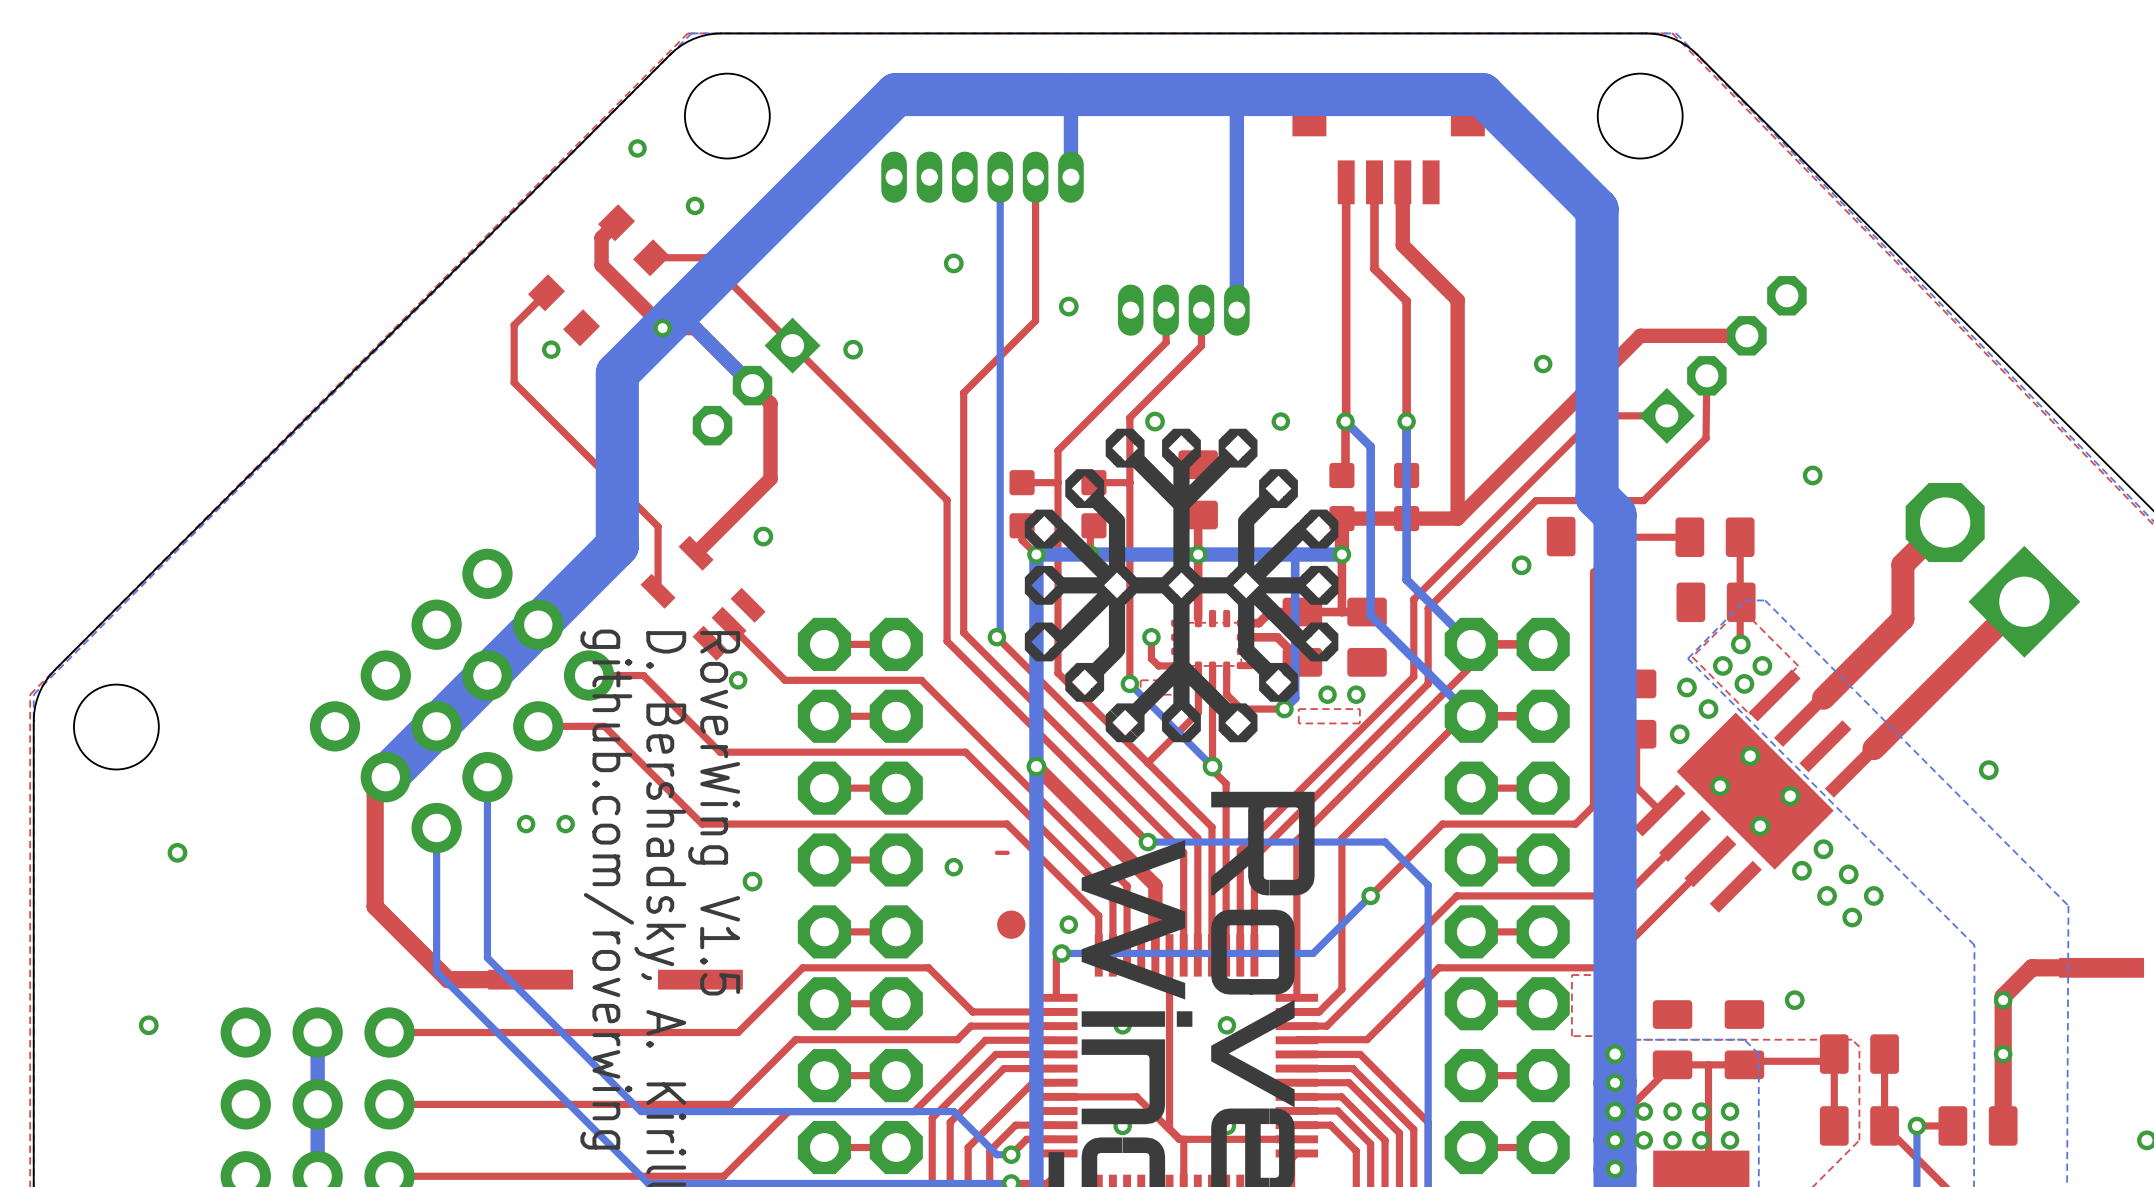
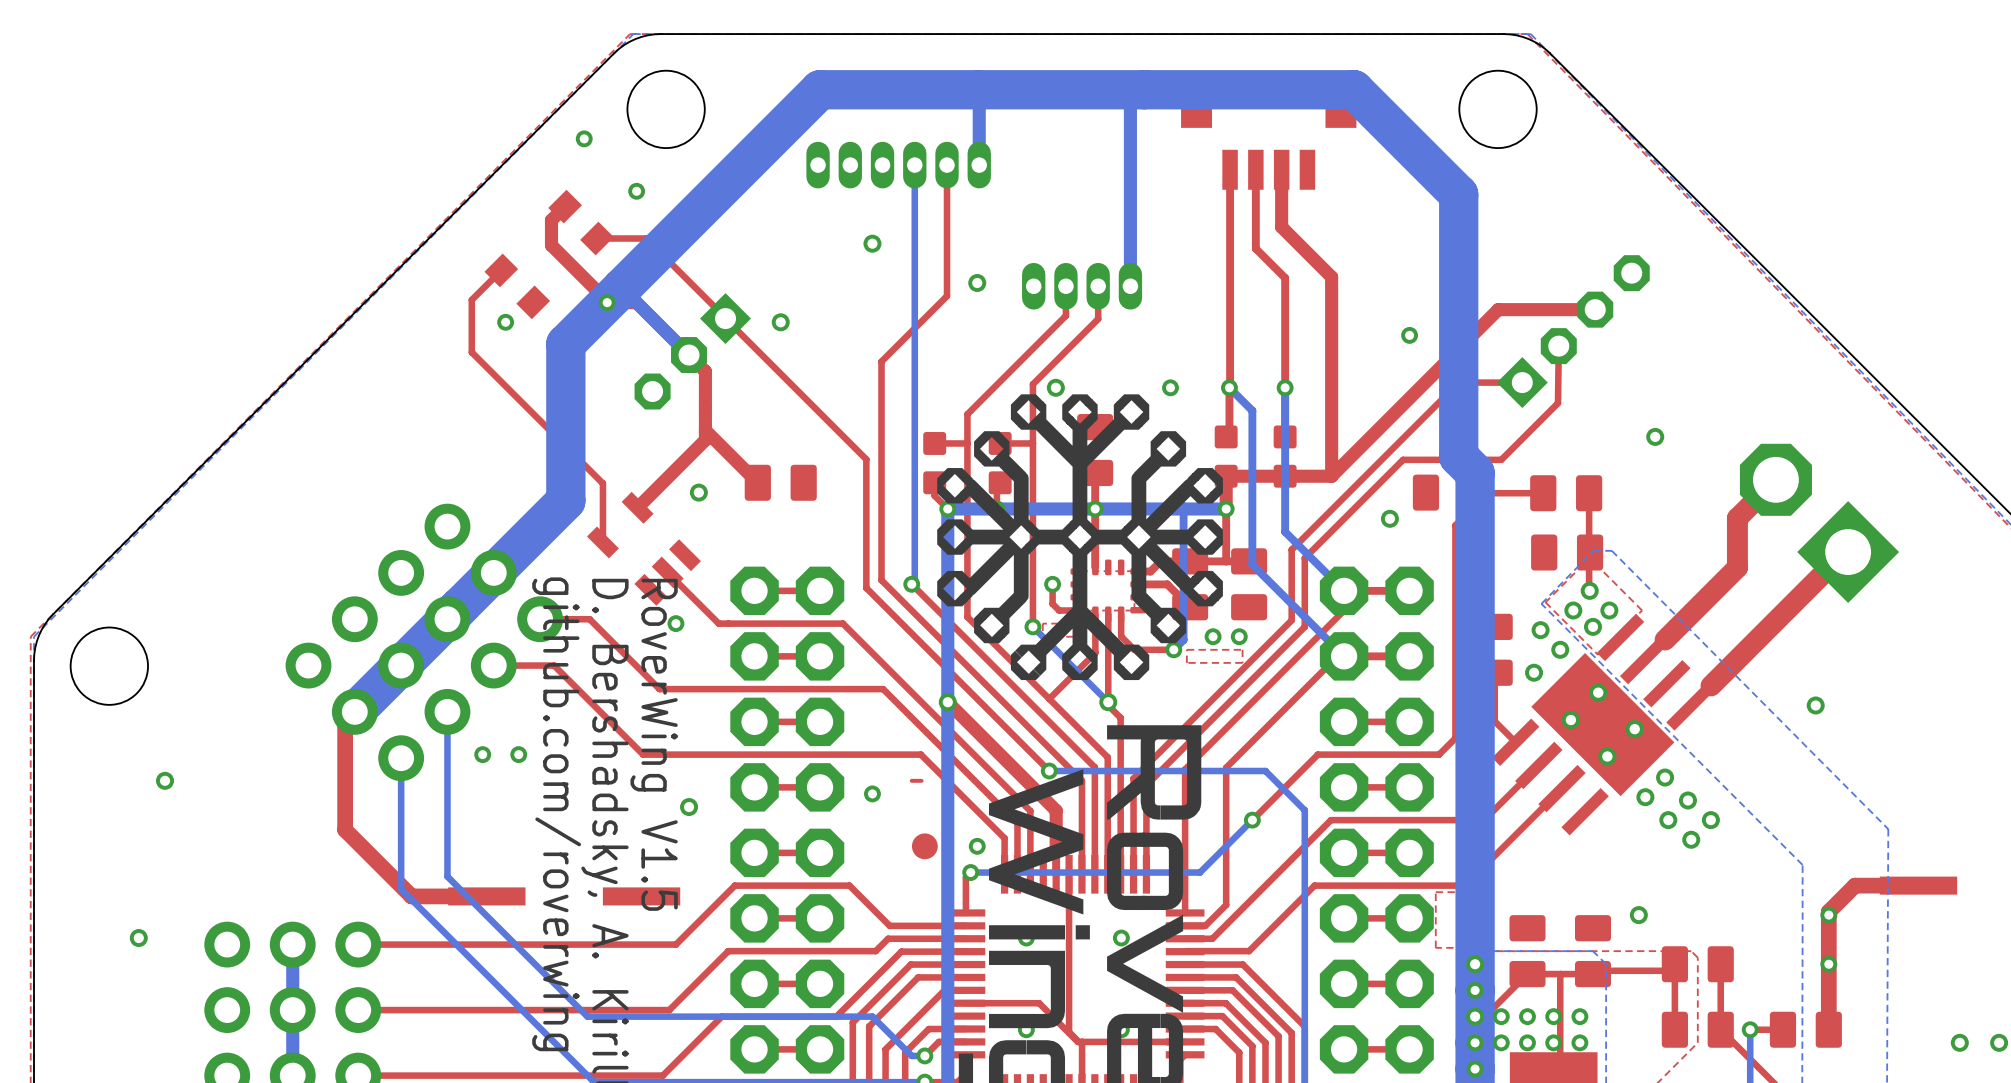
top track: none -> (705, 430) (757, 482)
part: none -> (780, 482)

